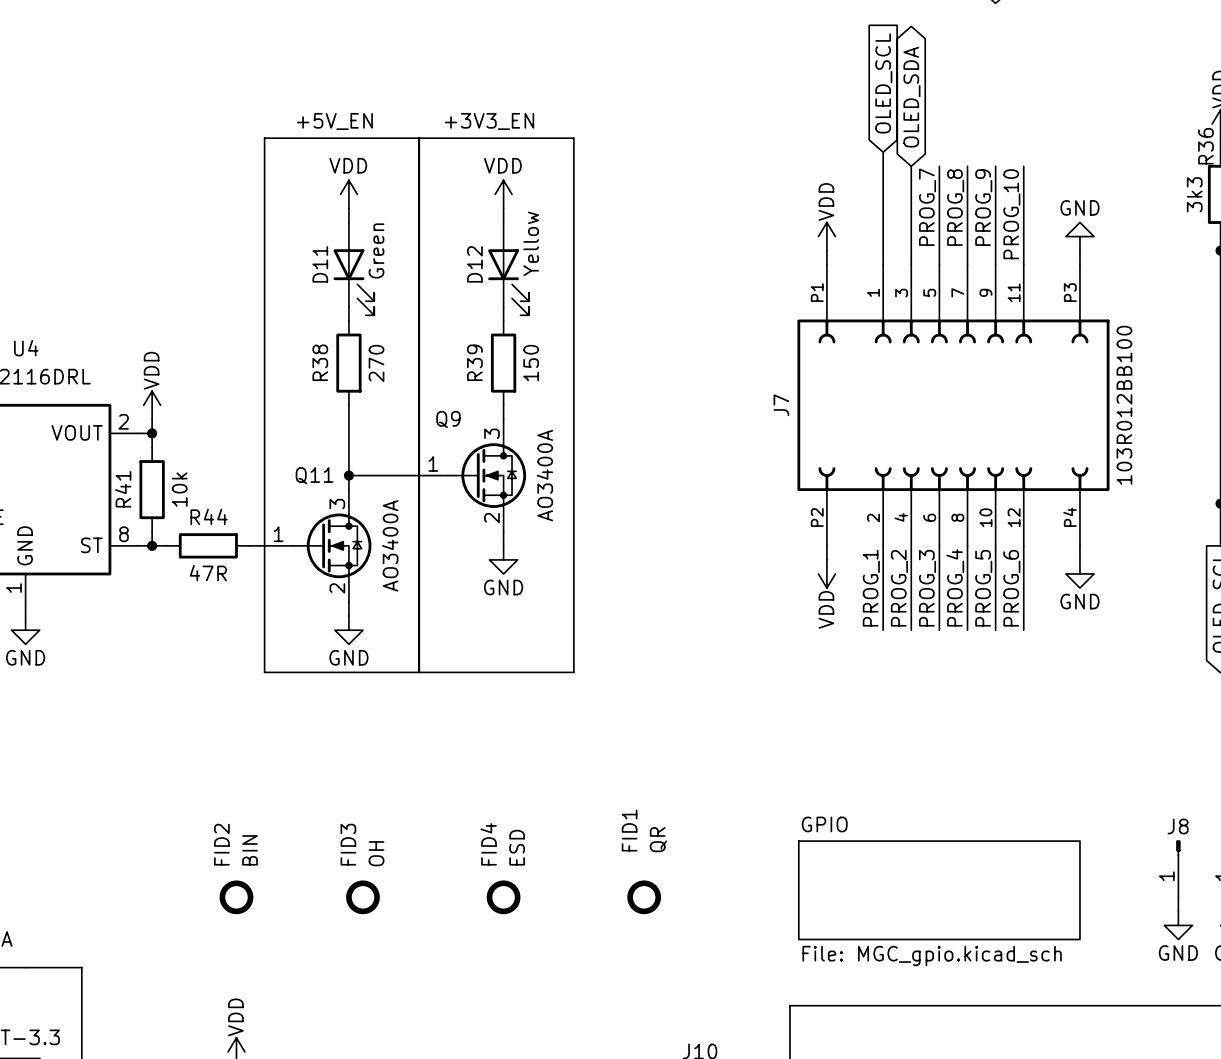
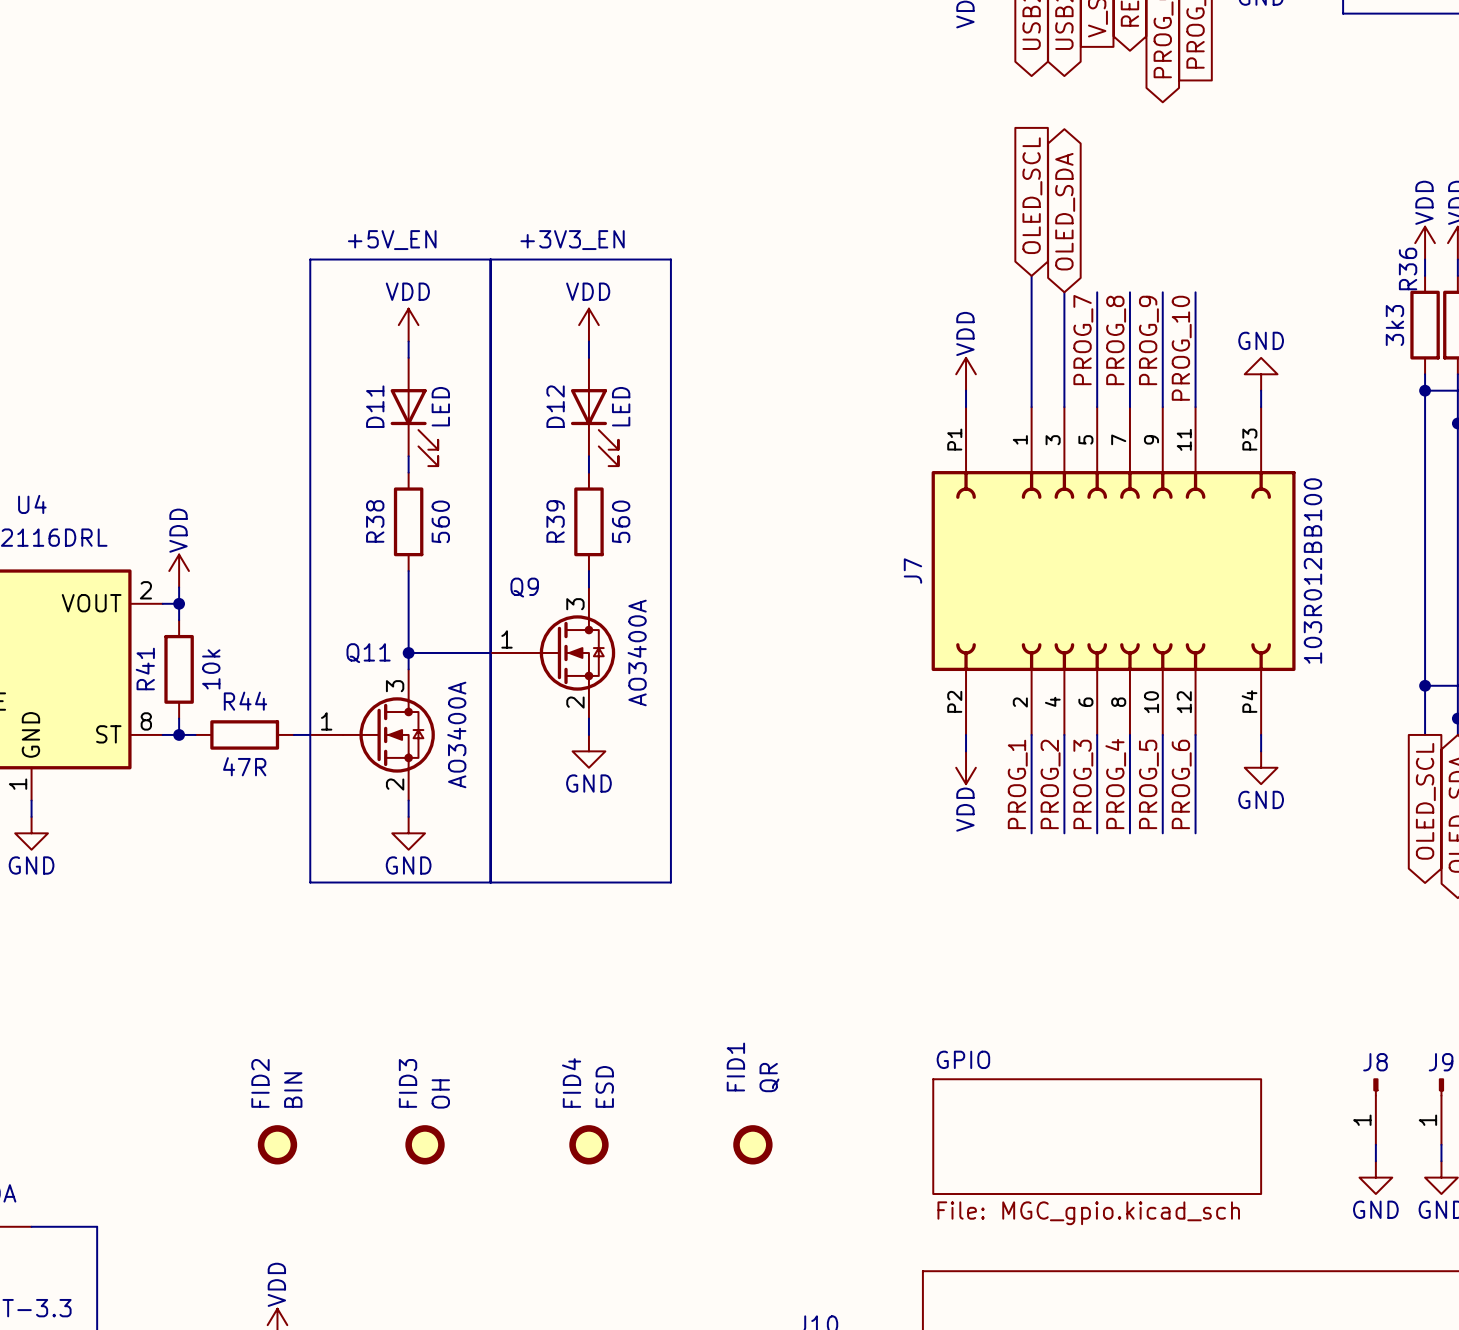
D12 value: Yellow (531, 243) -> LED (621, 406)
D11 value: Green (376, 250) -> LED (440, 406)
R38 value: 270 (376, 363) -> 560 (440, 521)
R39 value: 150 (531, 363) -> 560 (621, 521)

